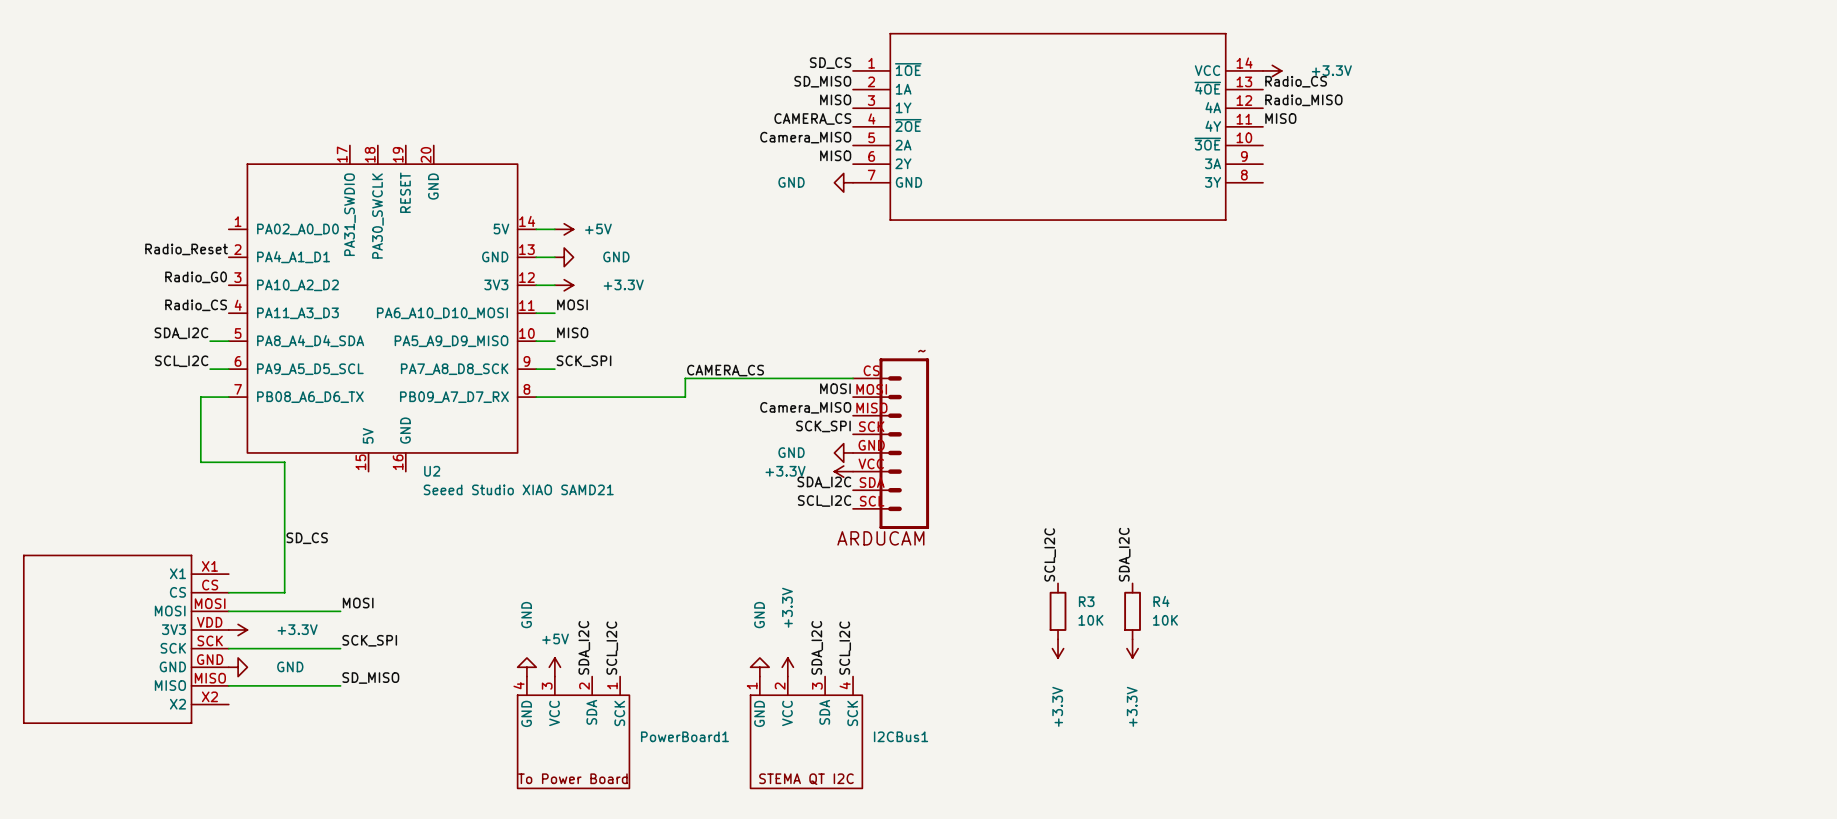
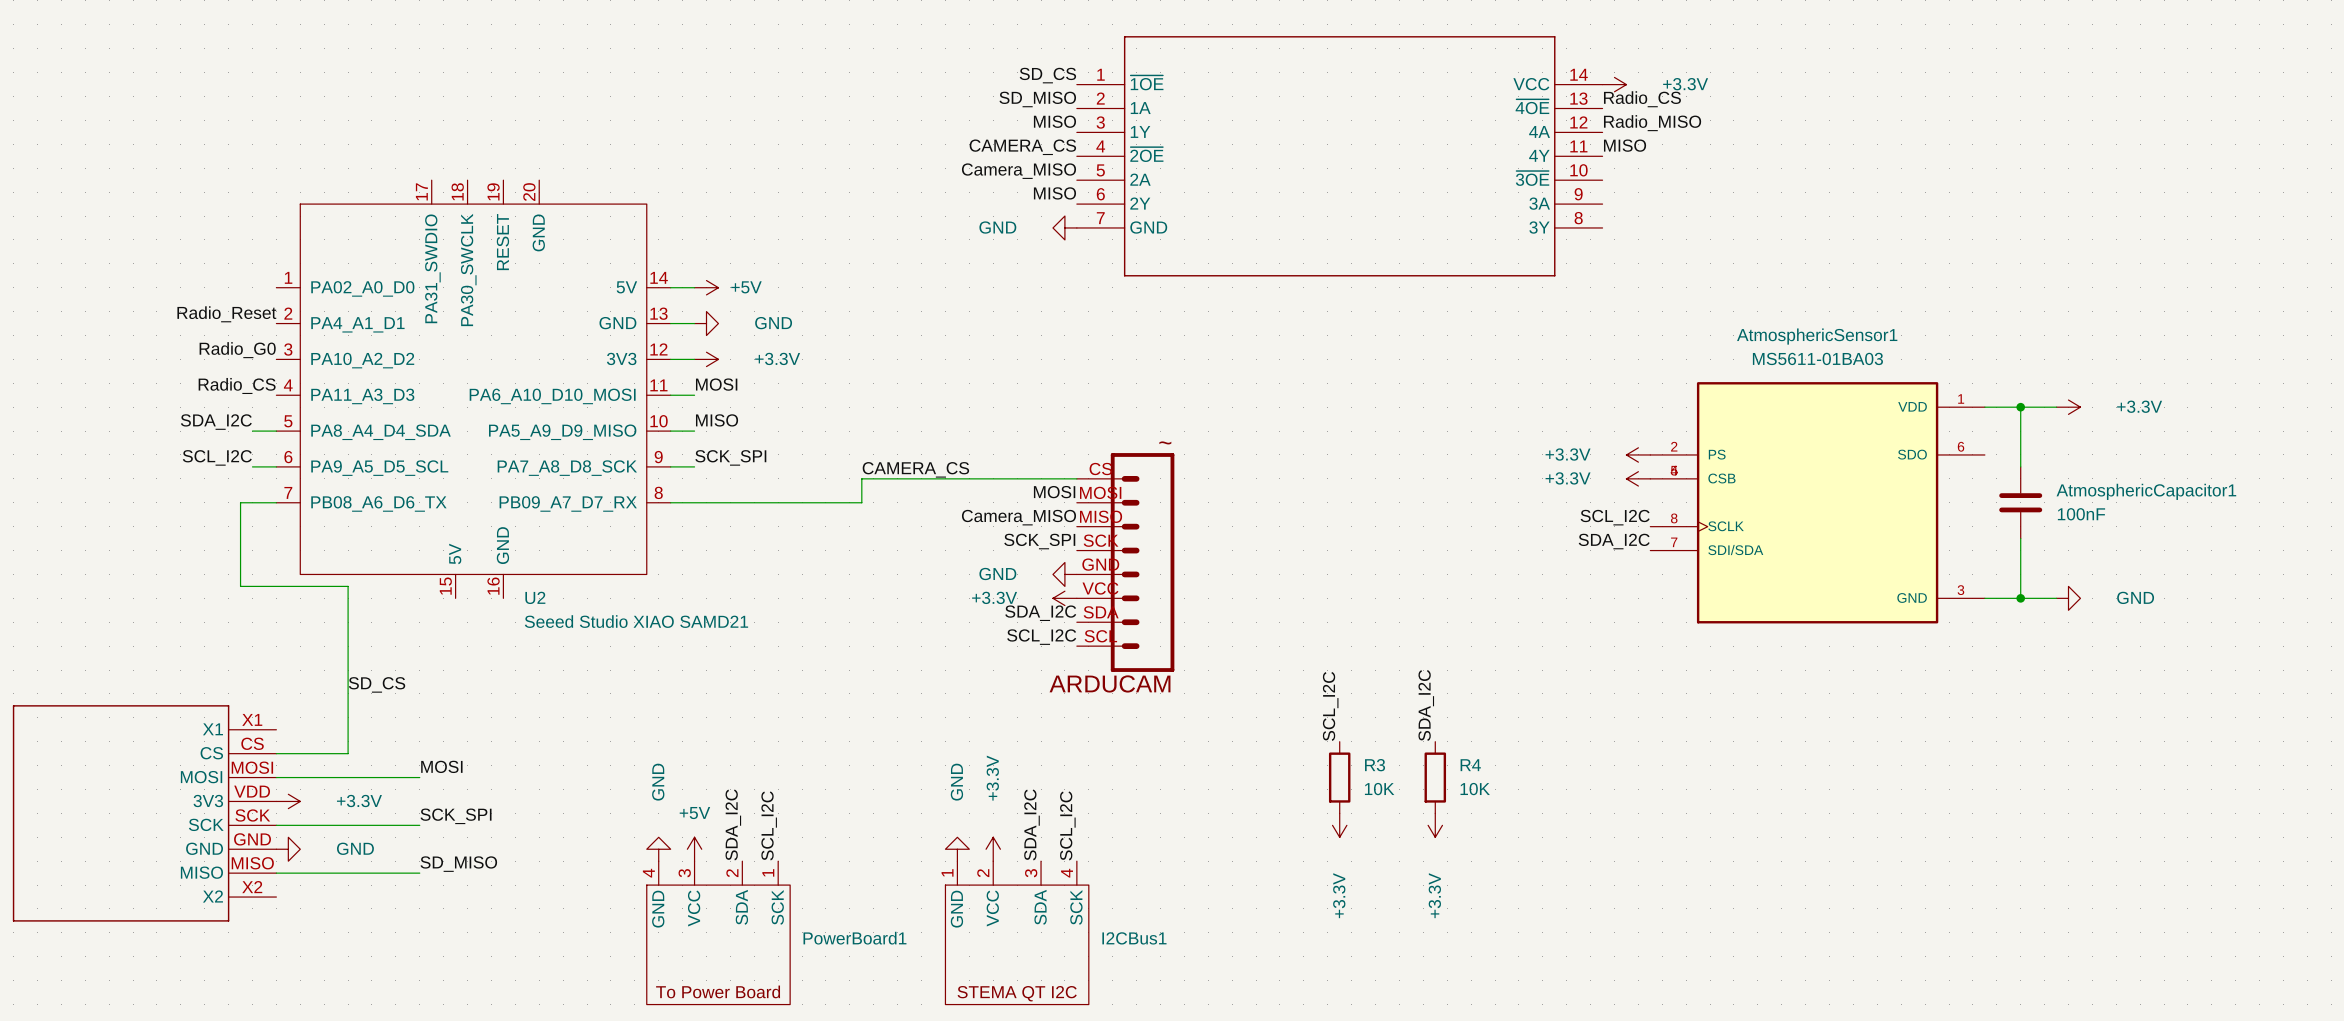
wire: none -> (1984, 407) (2056, 407)
wire: none -> (2020, 407) (2020, 466)
junction: none -> (2020, 407)
power symbol: none -> +3.3V (2068, 407)
power symbol: none -> +3.3V (1638, 454)
power symbol: none -> +3.3V (1638, 478)
AtmosphericSensor1: none -> MS5611-01BA03 (1817, 502)
AtmosphericCapacitor1: none -> 100nF (2020, 502)
label: none -> SCL_I2C (1615, 517)
wire: none -> (2020, 538) (2020, 598)
label: none -> SDA_I2C (1614, 541)
wire: none -> (1984, 598) (2056, 598)
junction: none -> (2020, 598)
power symbol: none -> GND (2068, 598)

